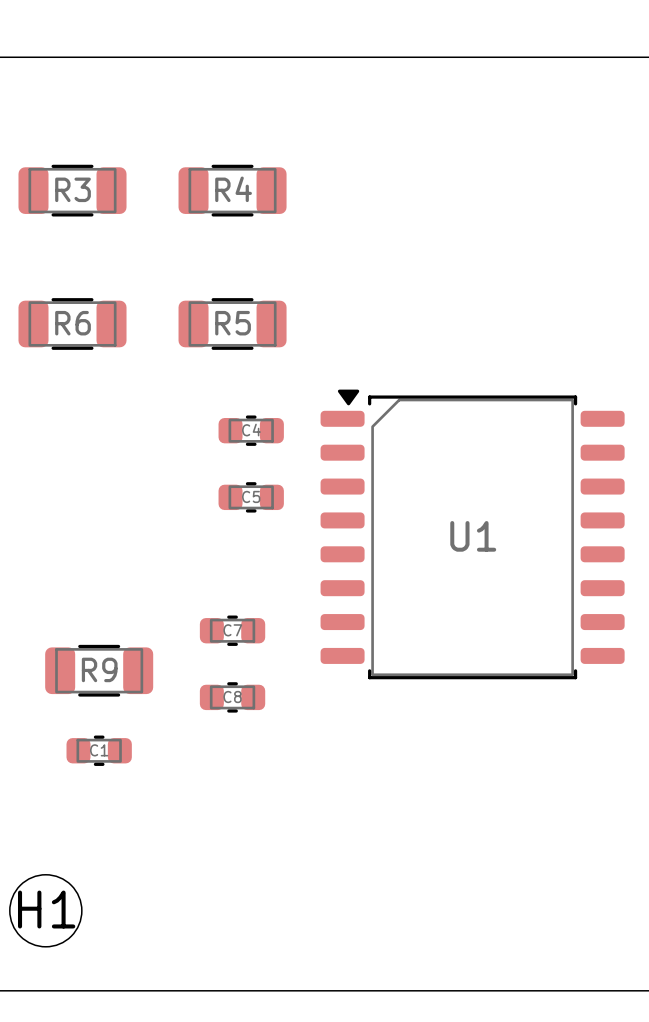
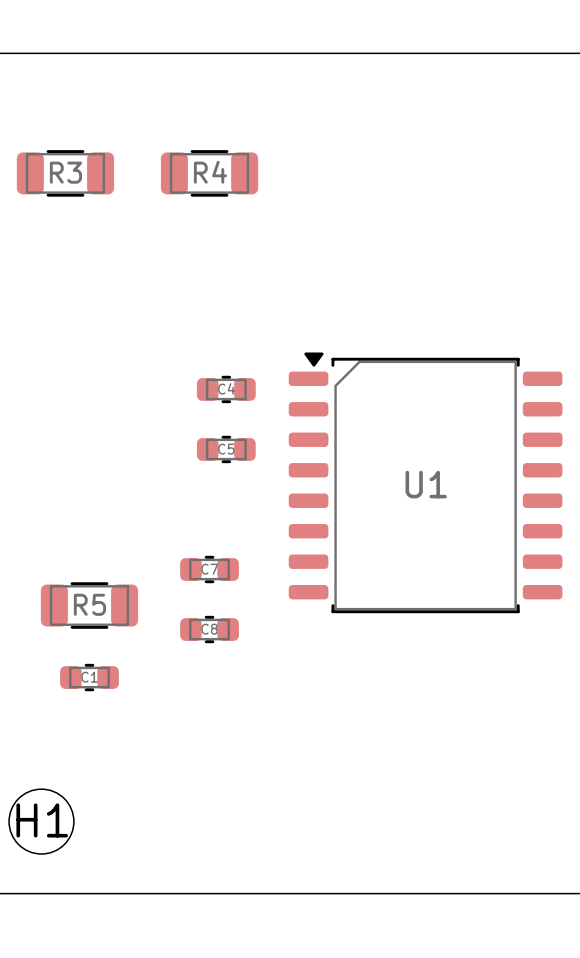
R6: (72, 323) -> none
R5: (232, 323) -> none
R9 name: R9 (99, 669) -> R5 (89, 604)

